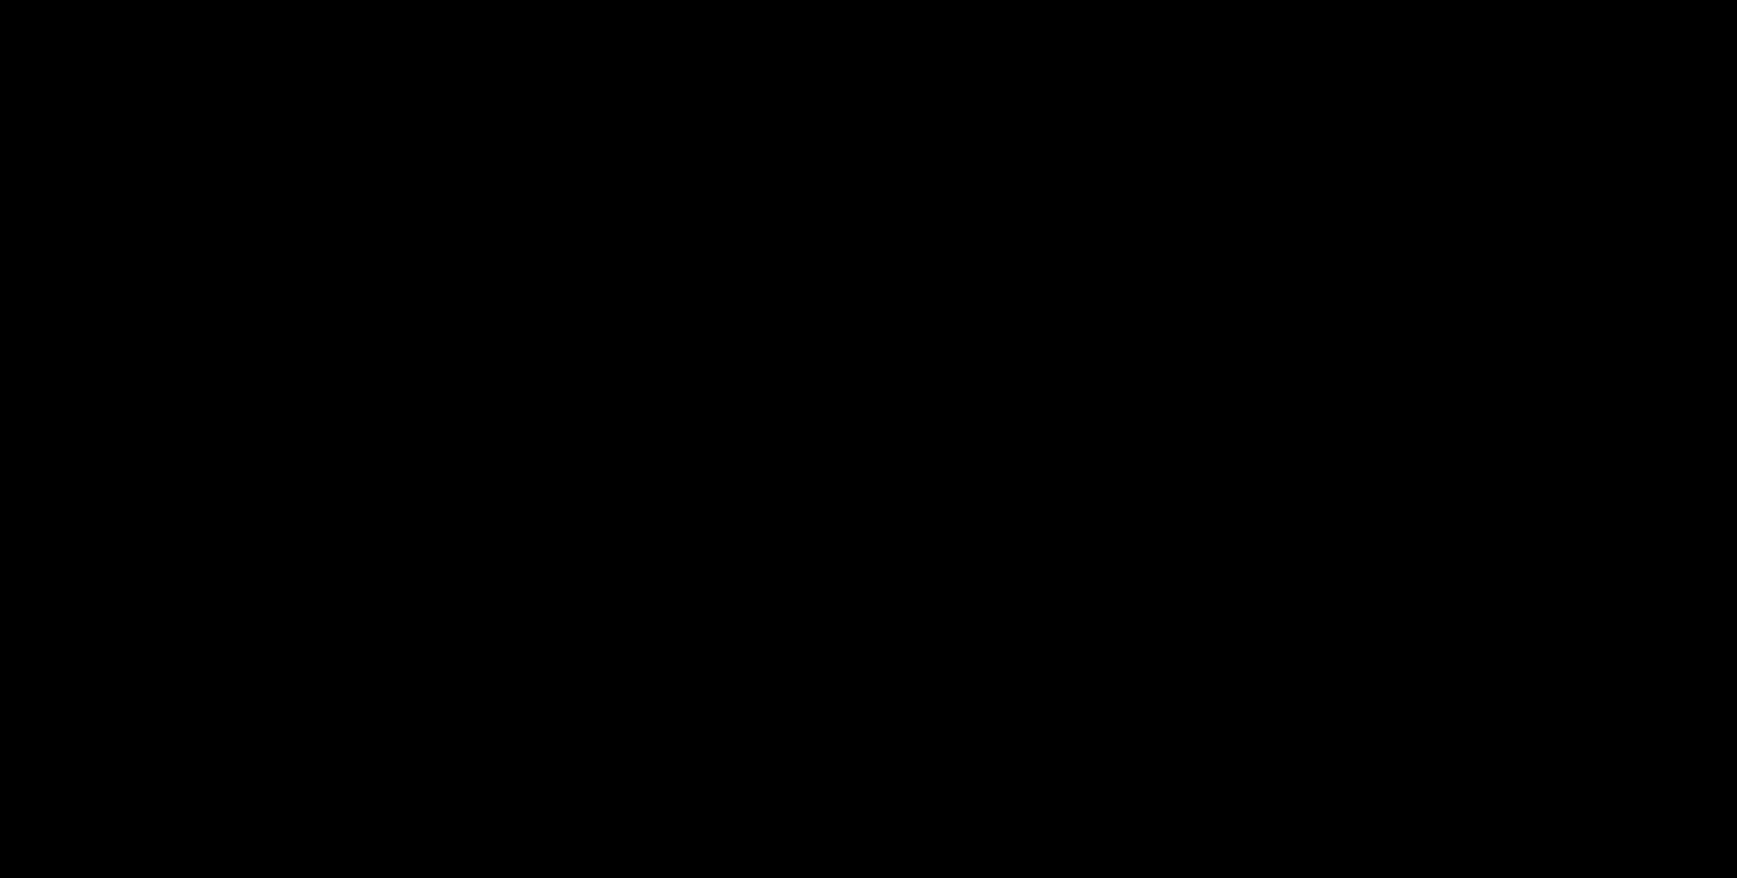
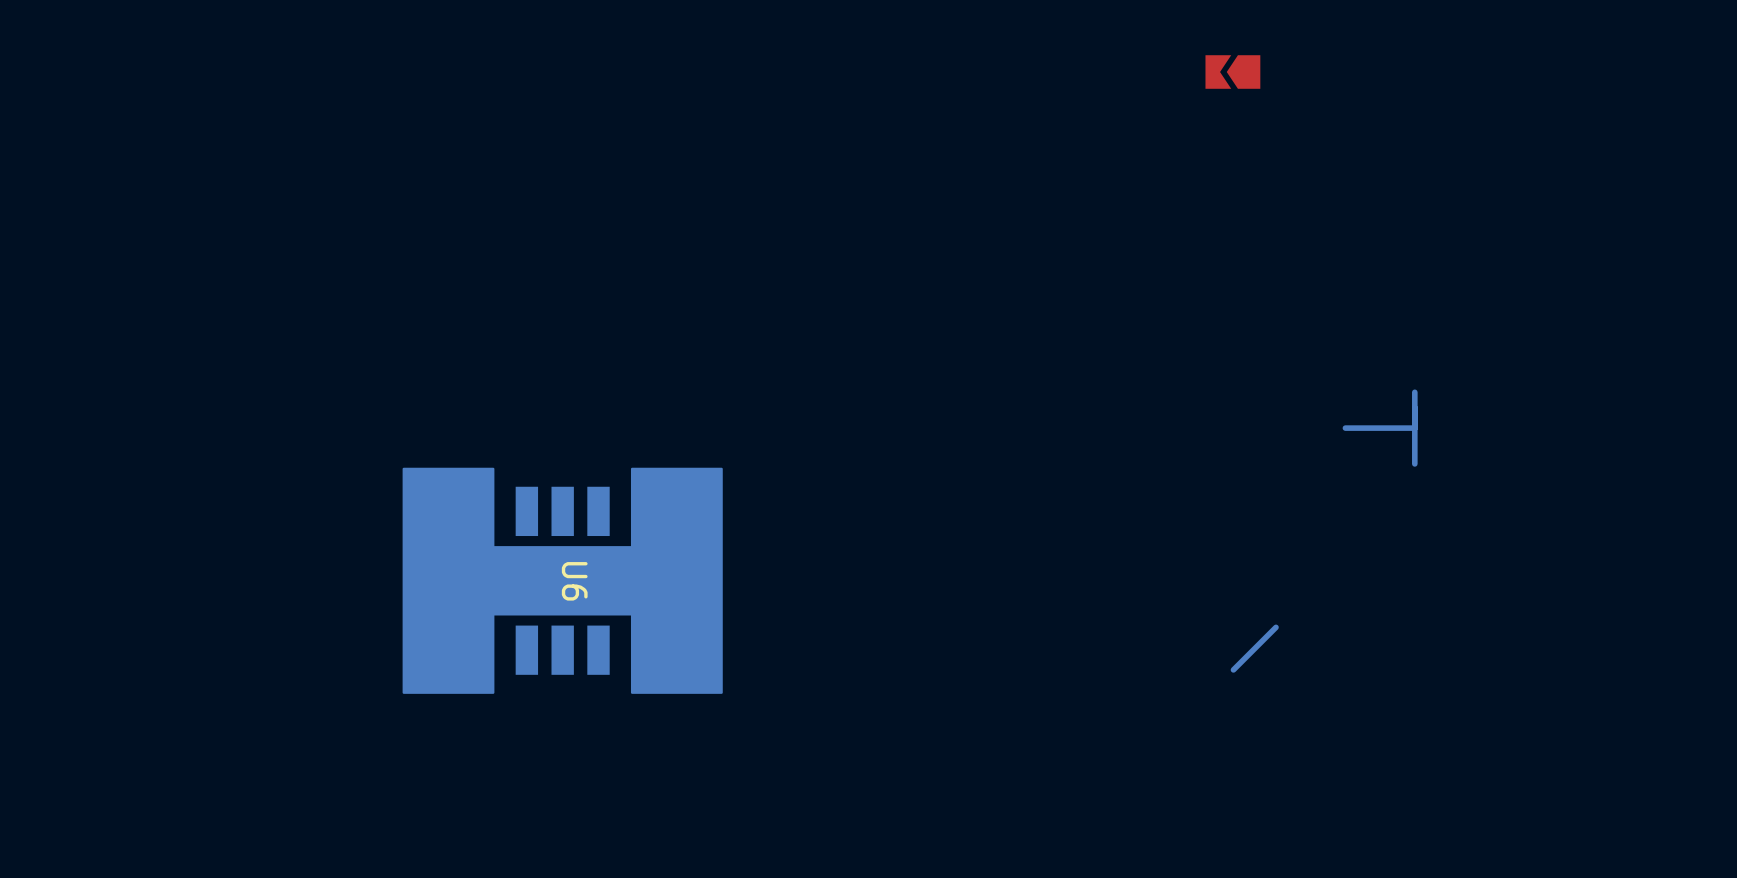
part: none -> (1232, 72)
bottom track: none -> (1414, 392) (1414, 463)
bottom track: none -> (1414, 428) (1345, 428)
U6: none -> (562, 580)
bottom track: none -> (1276, 627) (1233, 669)

